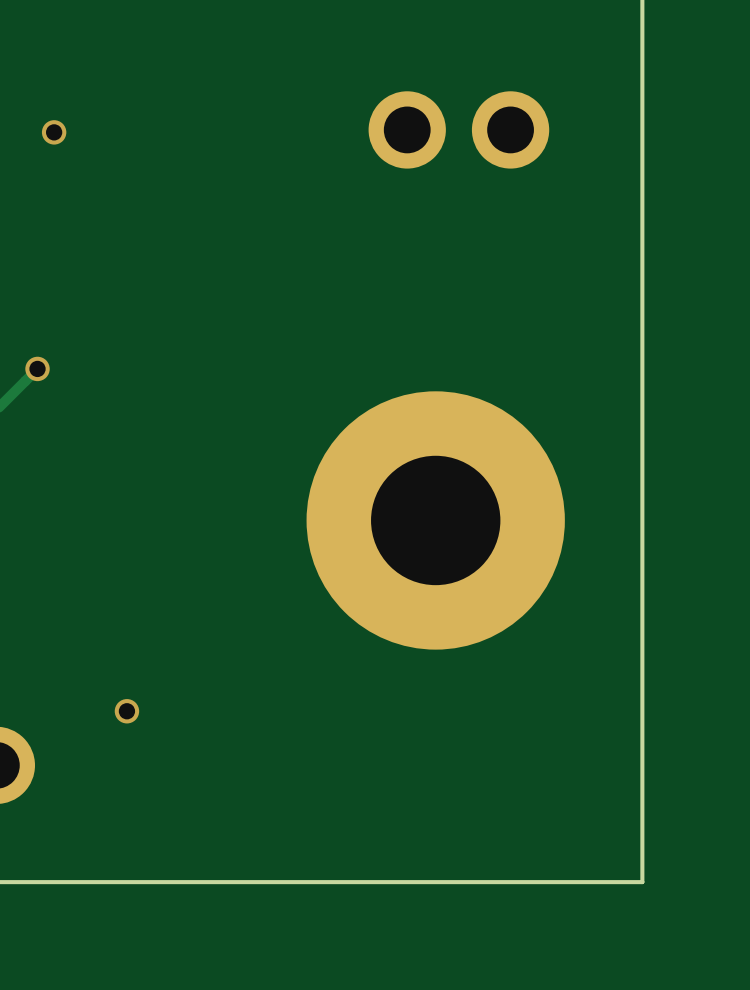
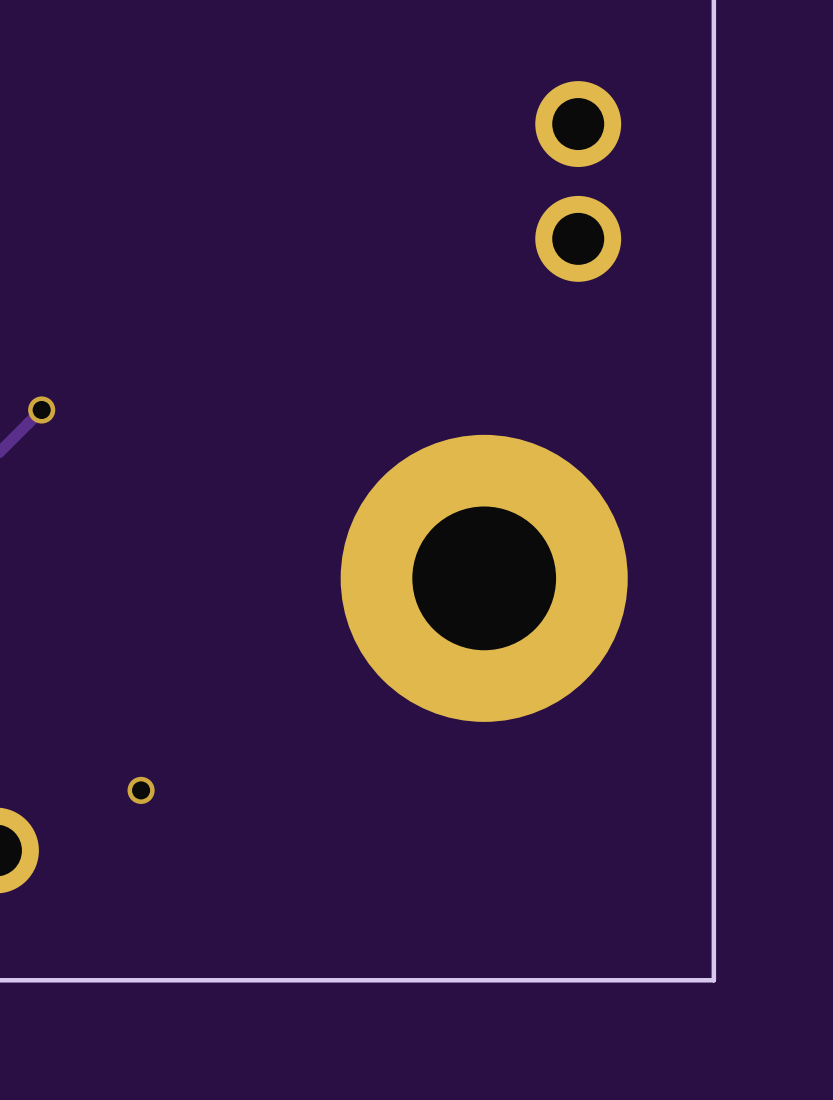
part rotation: 0° (458, 129) -> 90° clockwise (578, 181)
via: (54, 132) -> none

